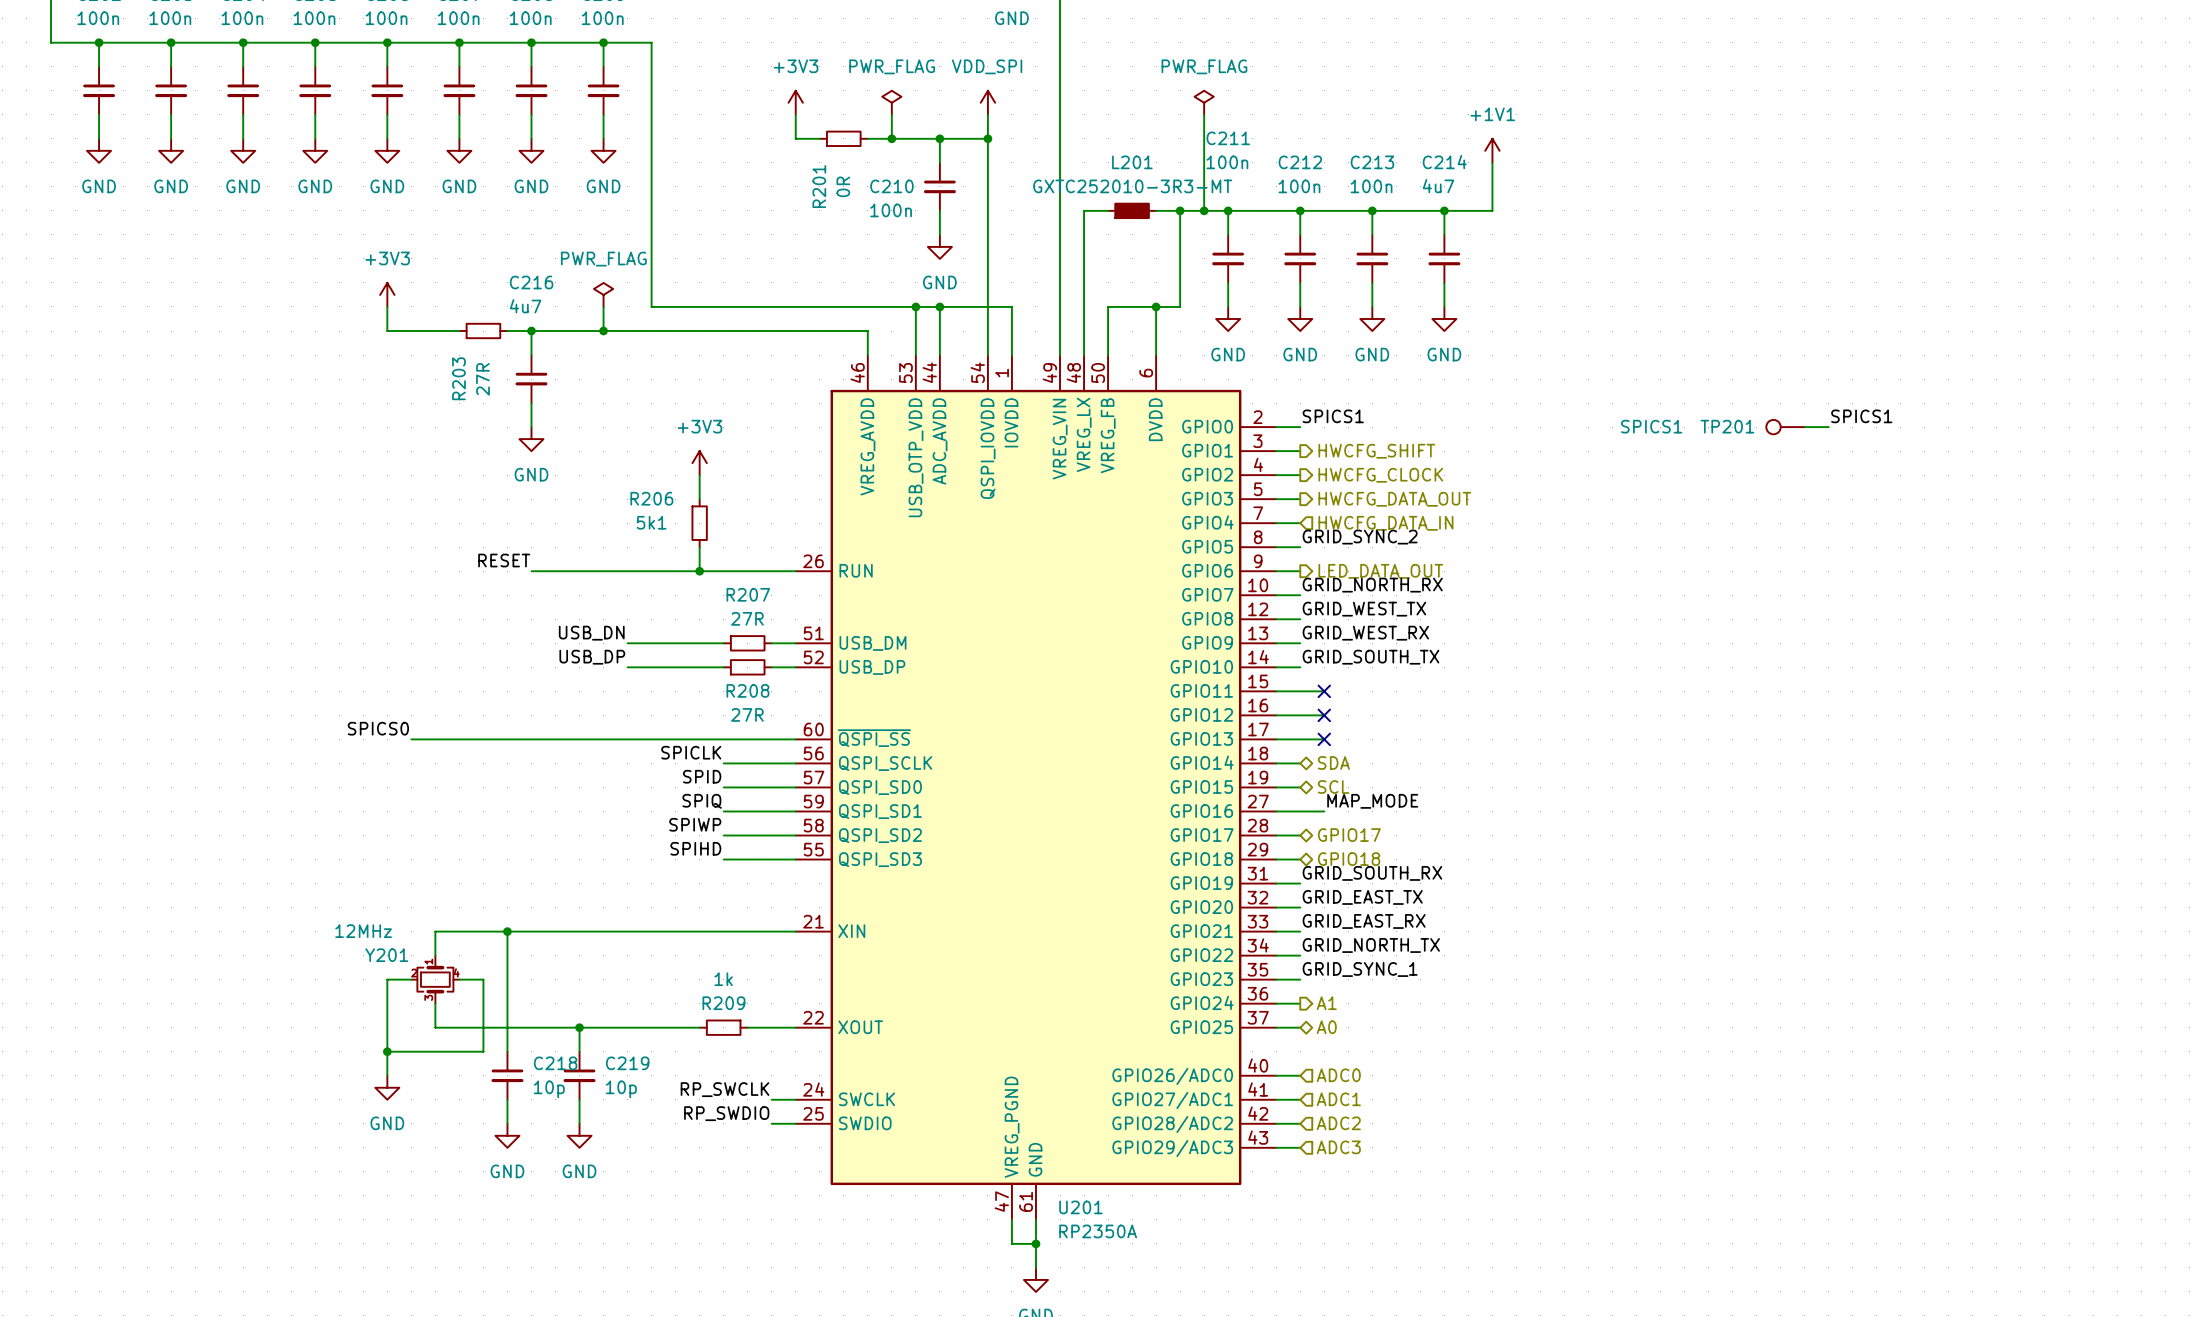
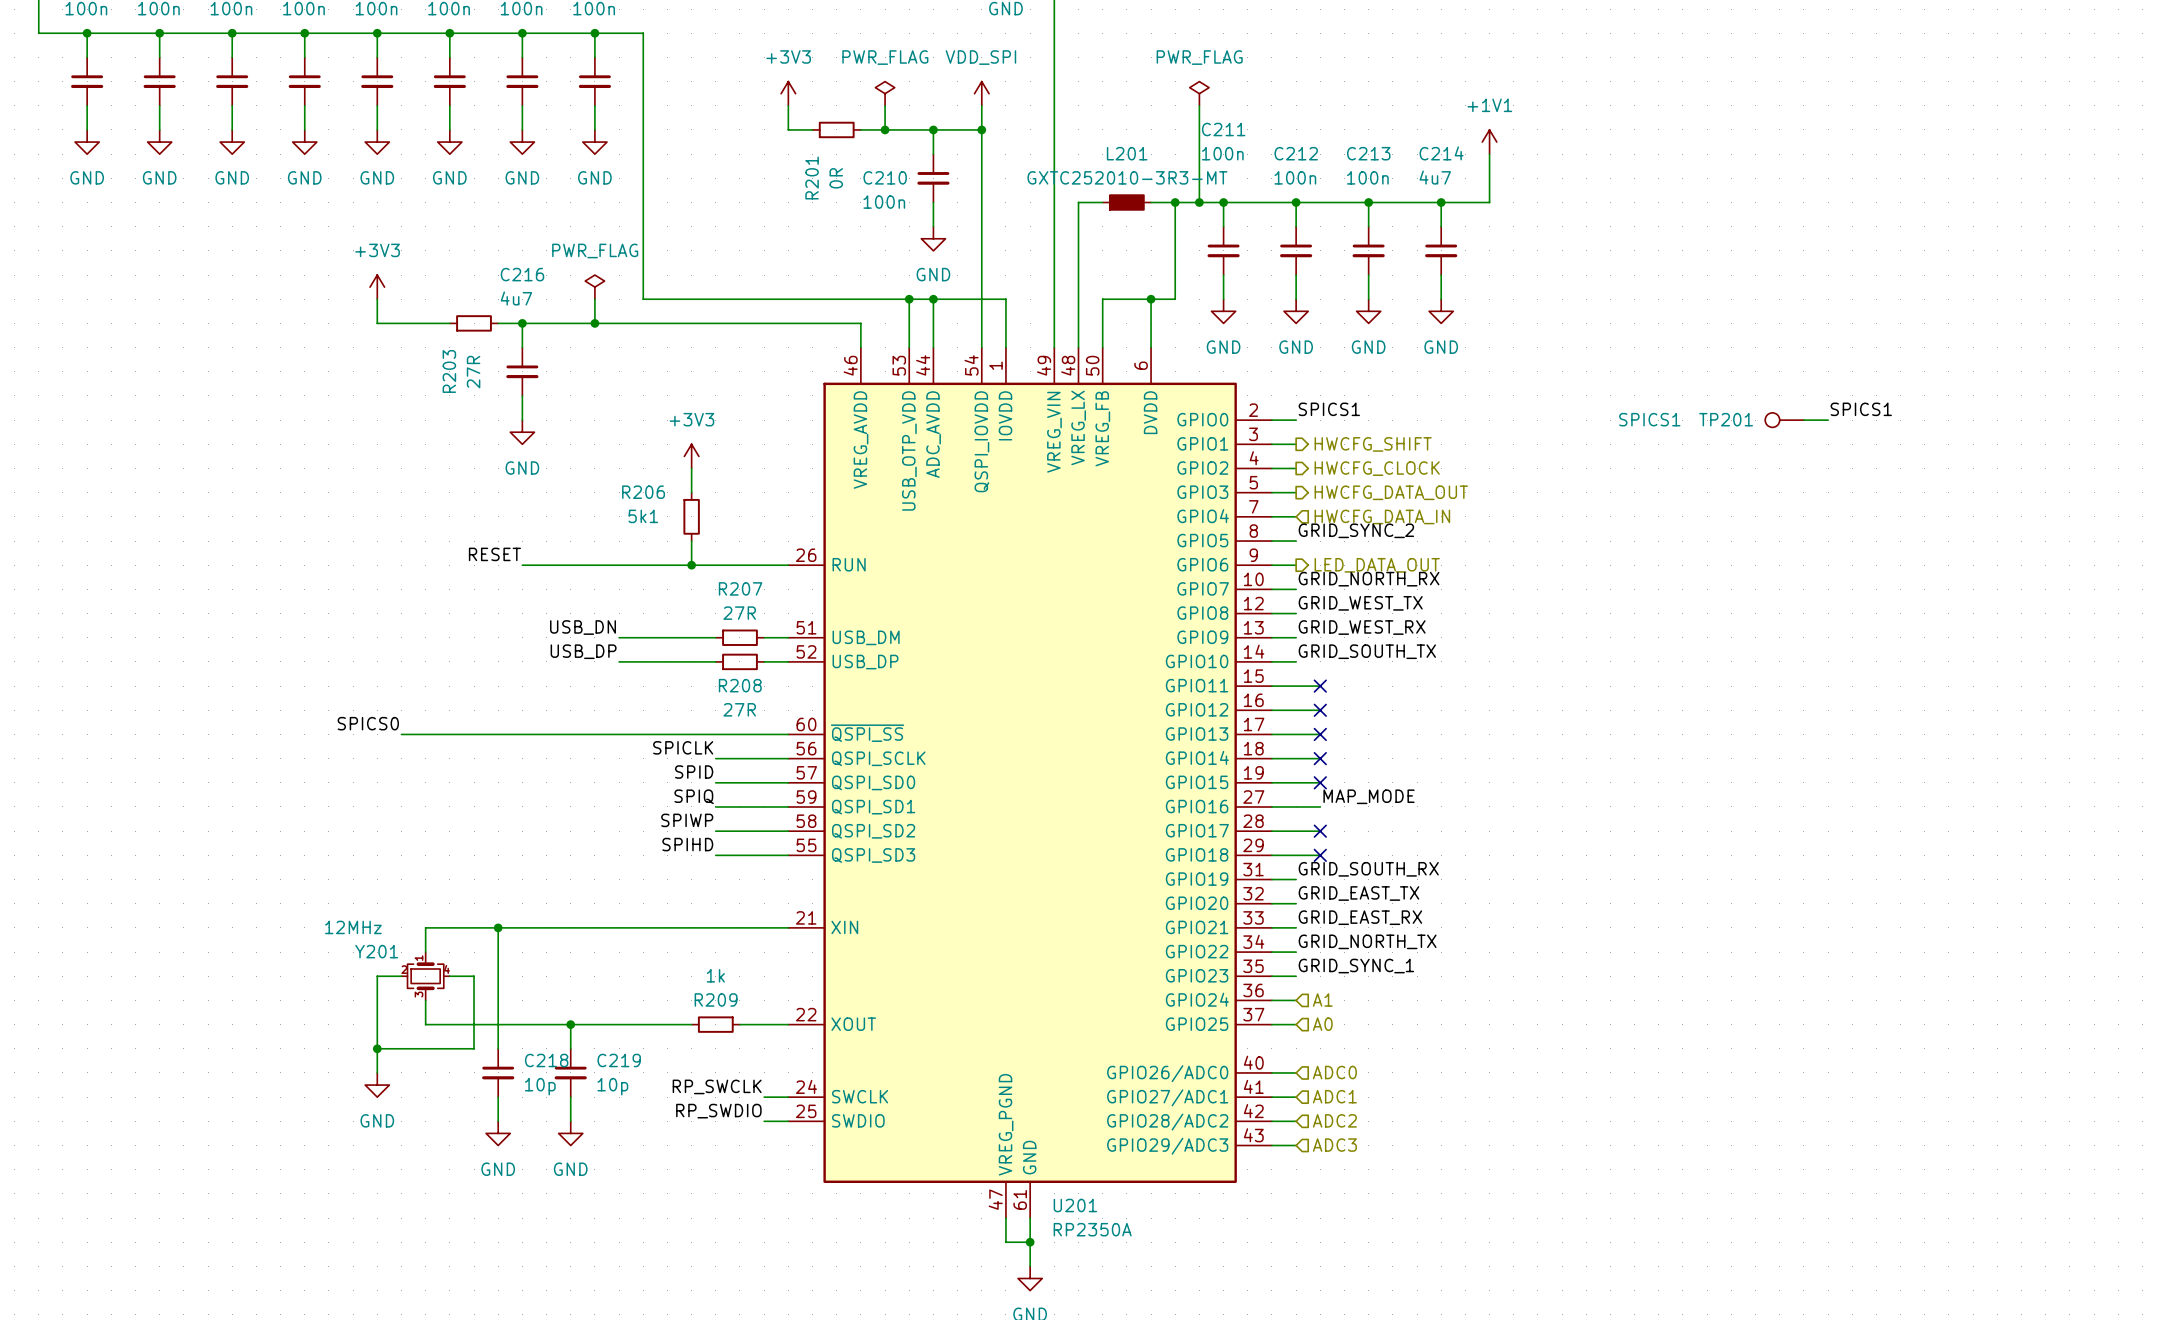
hierarchical label: SDA (1333, 762) -> none
wire: none -> (1296, 758) (1320, 758)
no-connect mark: none -> (1320, 758)
wire: none -> (1296, 782) (1320, 782)
no-connect mark: none -> (1320, 782)
hierarchical label: SCL (1333, 787) -> none
wire: none -> (1296, 831) (1320, 831)
no-connect mark: none -> (1320, 831)
hierarchical label: GPIO17 (1349, 835) -> none
wire: none -> (1296, 855) (1320, 855)
no-connect mark: none -> (1320, 855)
hierarchical label: GPIO18 (1349, 859) -> none
hierarchical label shape: output (1326, 1003) -> input (1322, 999)
hierarchical label shape: bidirectional (1326, 1027) -> input (1322, 1024)

